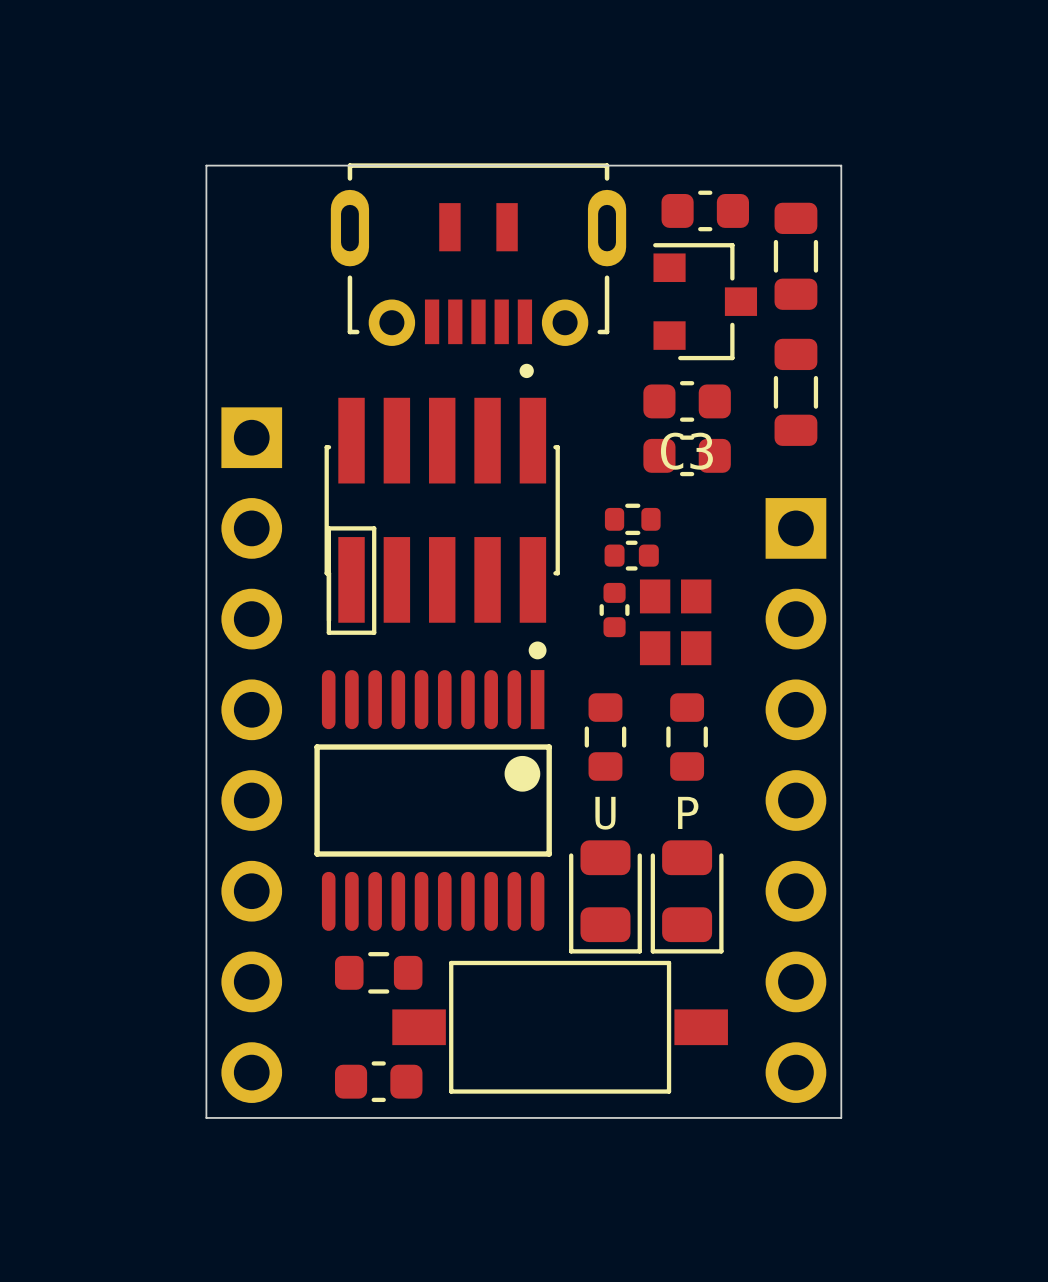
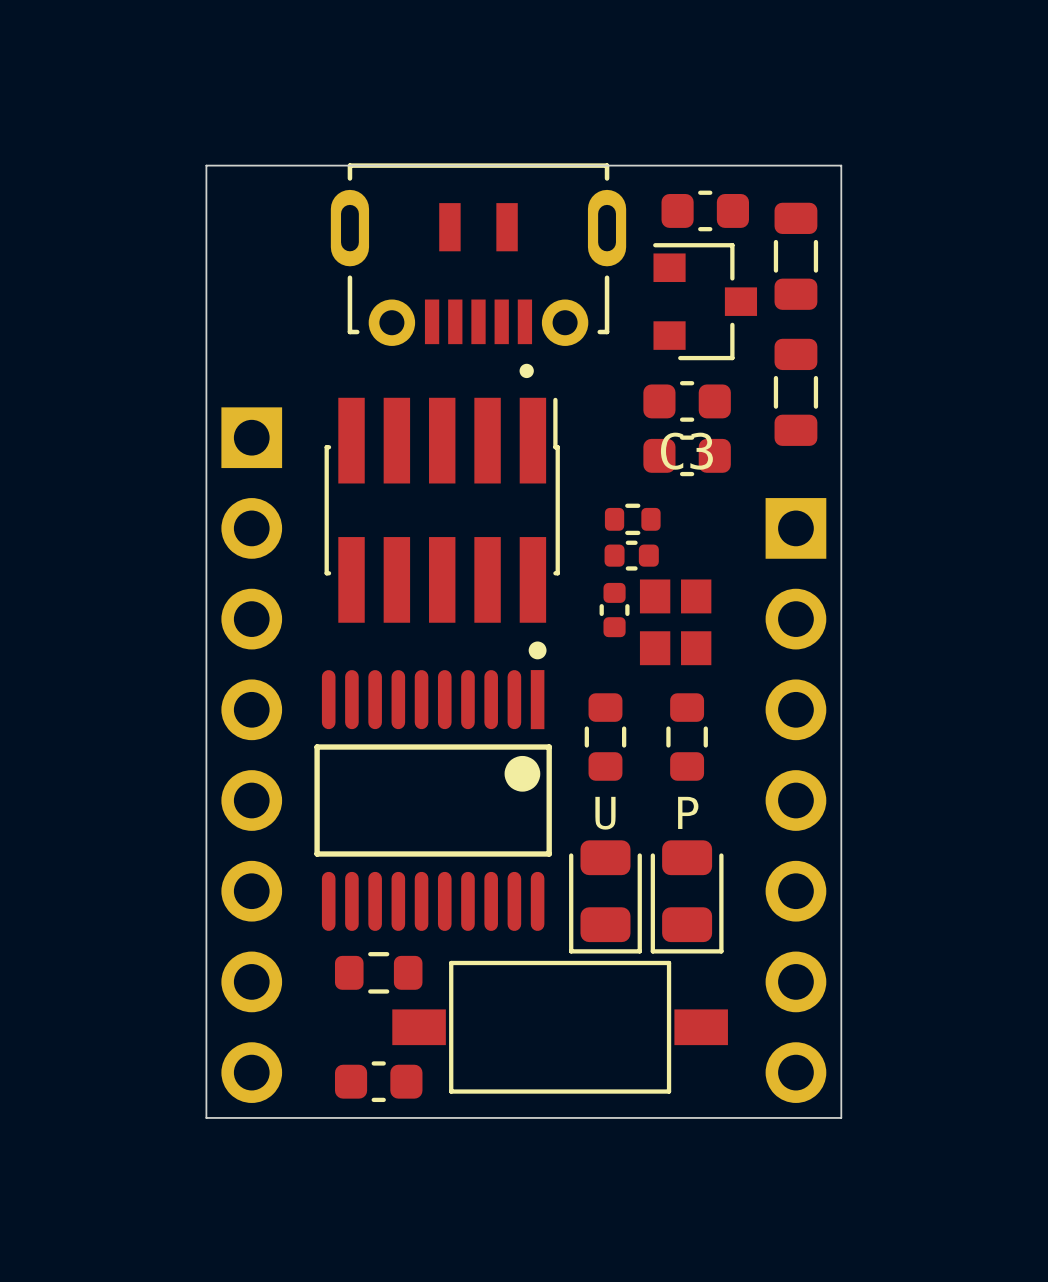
part rotation: 0° (442, 510) -> 180° (442, 510)
line: (328, 528) (328, 632) (374, 632) (374, 528) (328, 528) -> none

